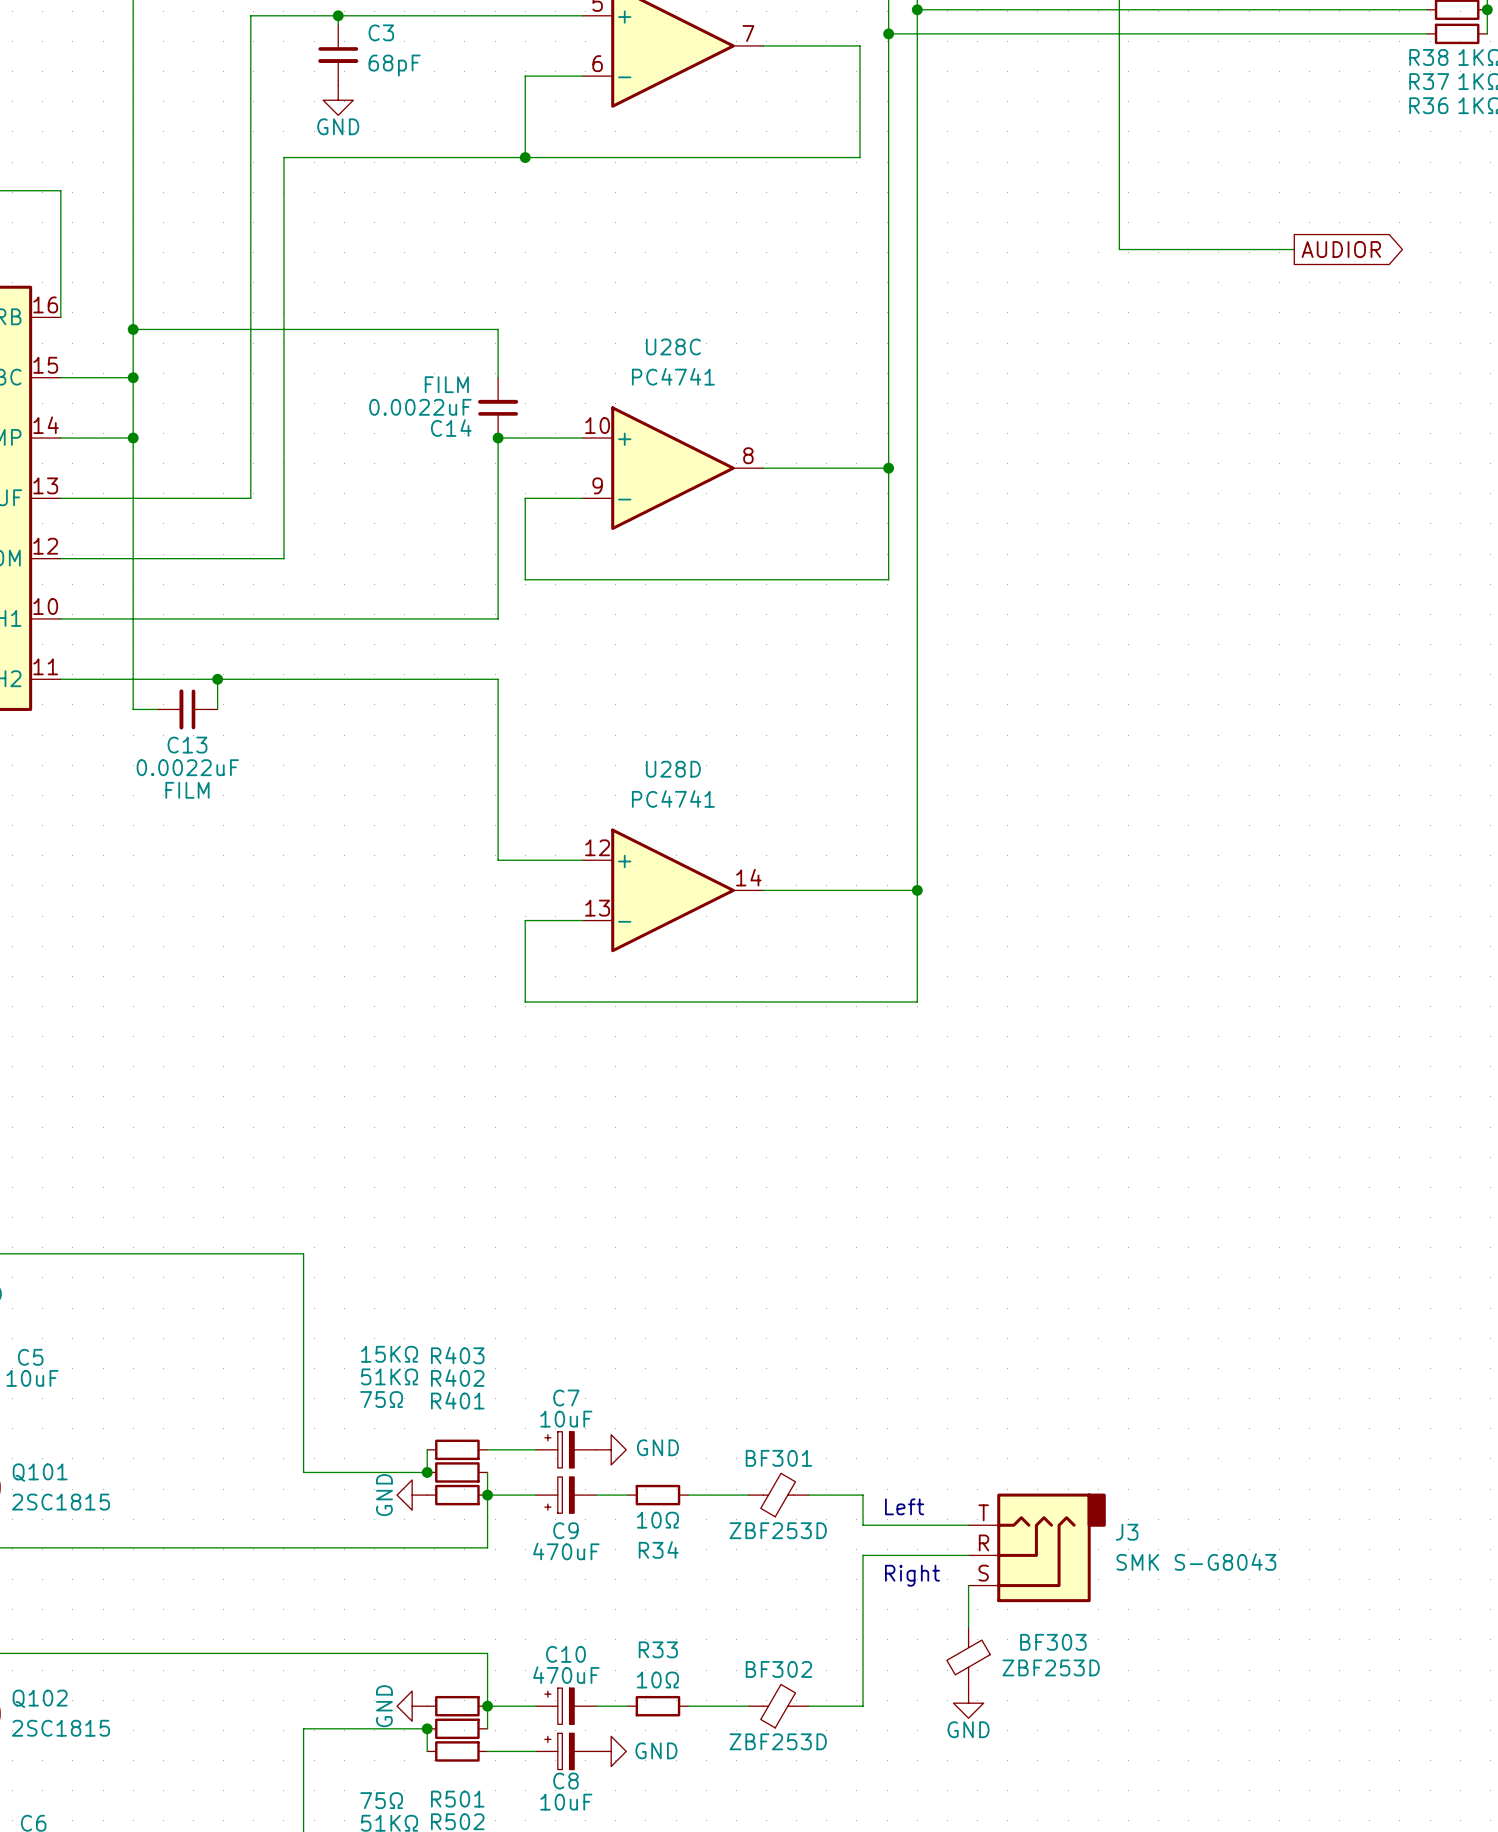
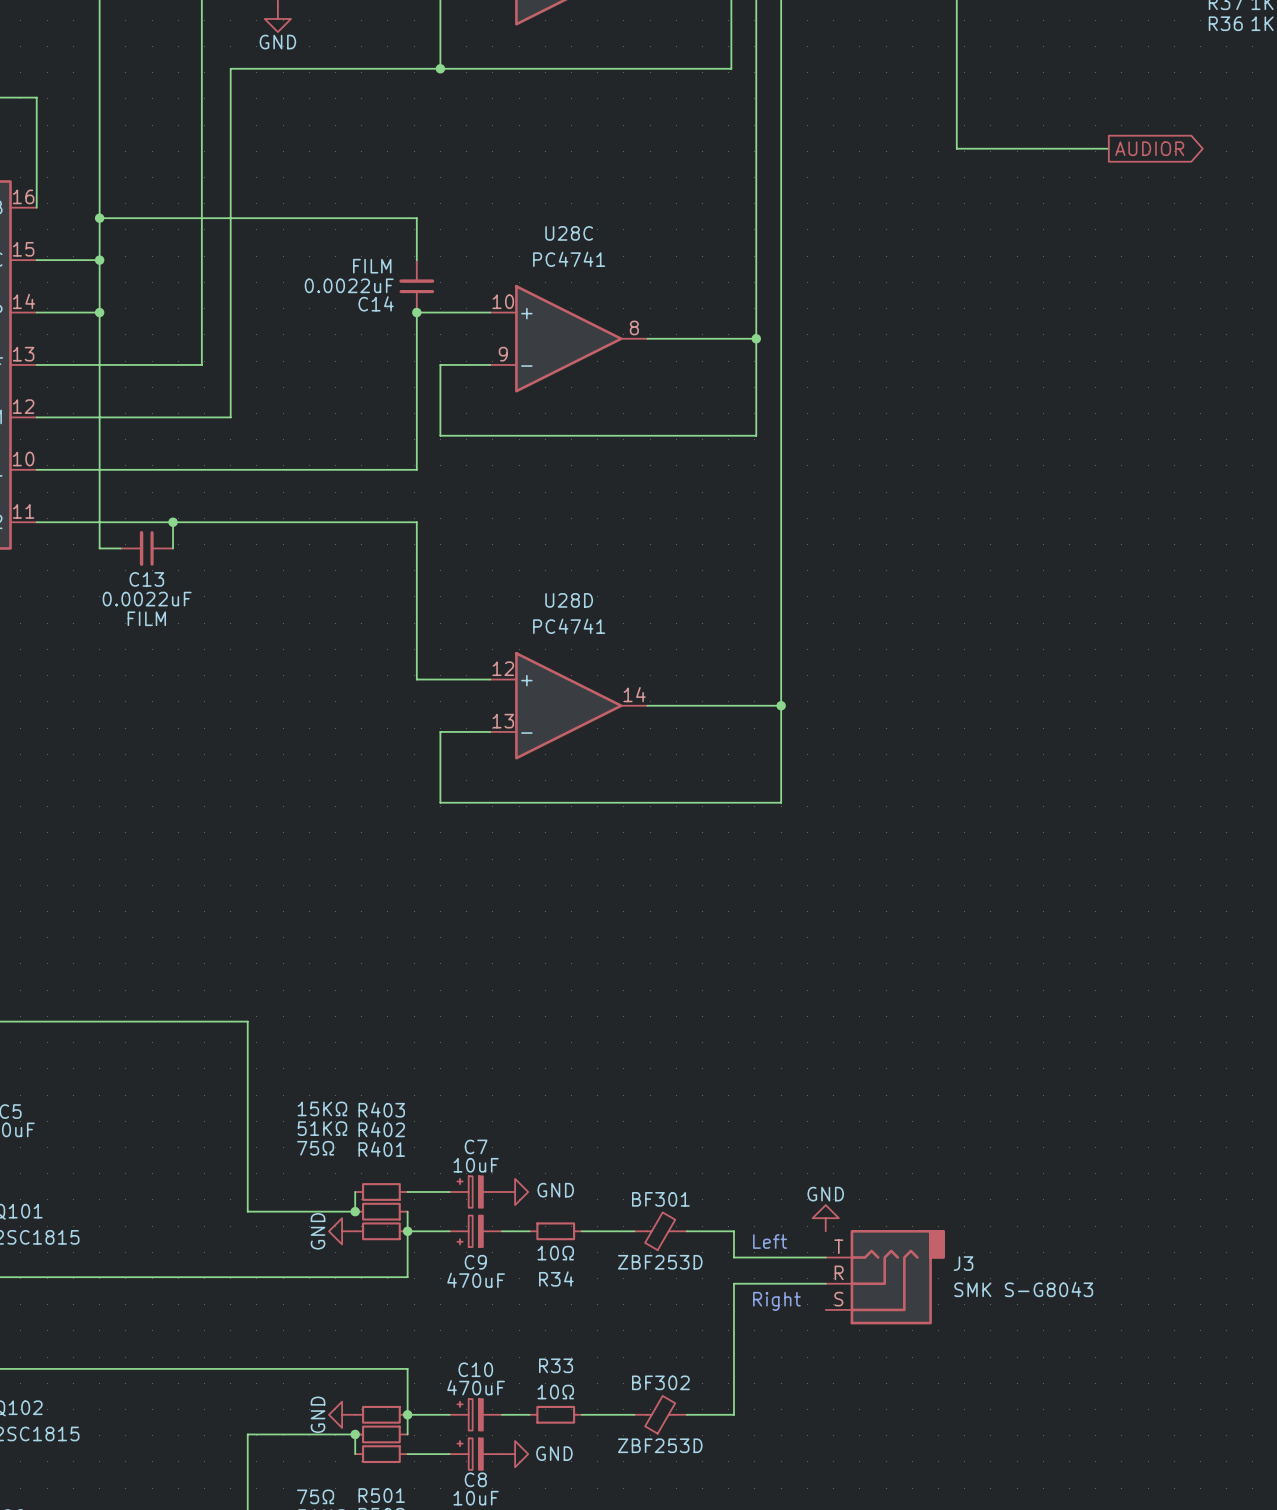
wire: (968, 1585) (968, 1627) -> none
BF303: ZBF253D (968, 1657) -> none
power symbol rotation: 0° (968, 1703) -> 180° (825, 1218)
power symbol position: GND (968, 1703) -> GND (825, 1218)

